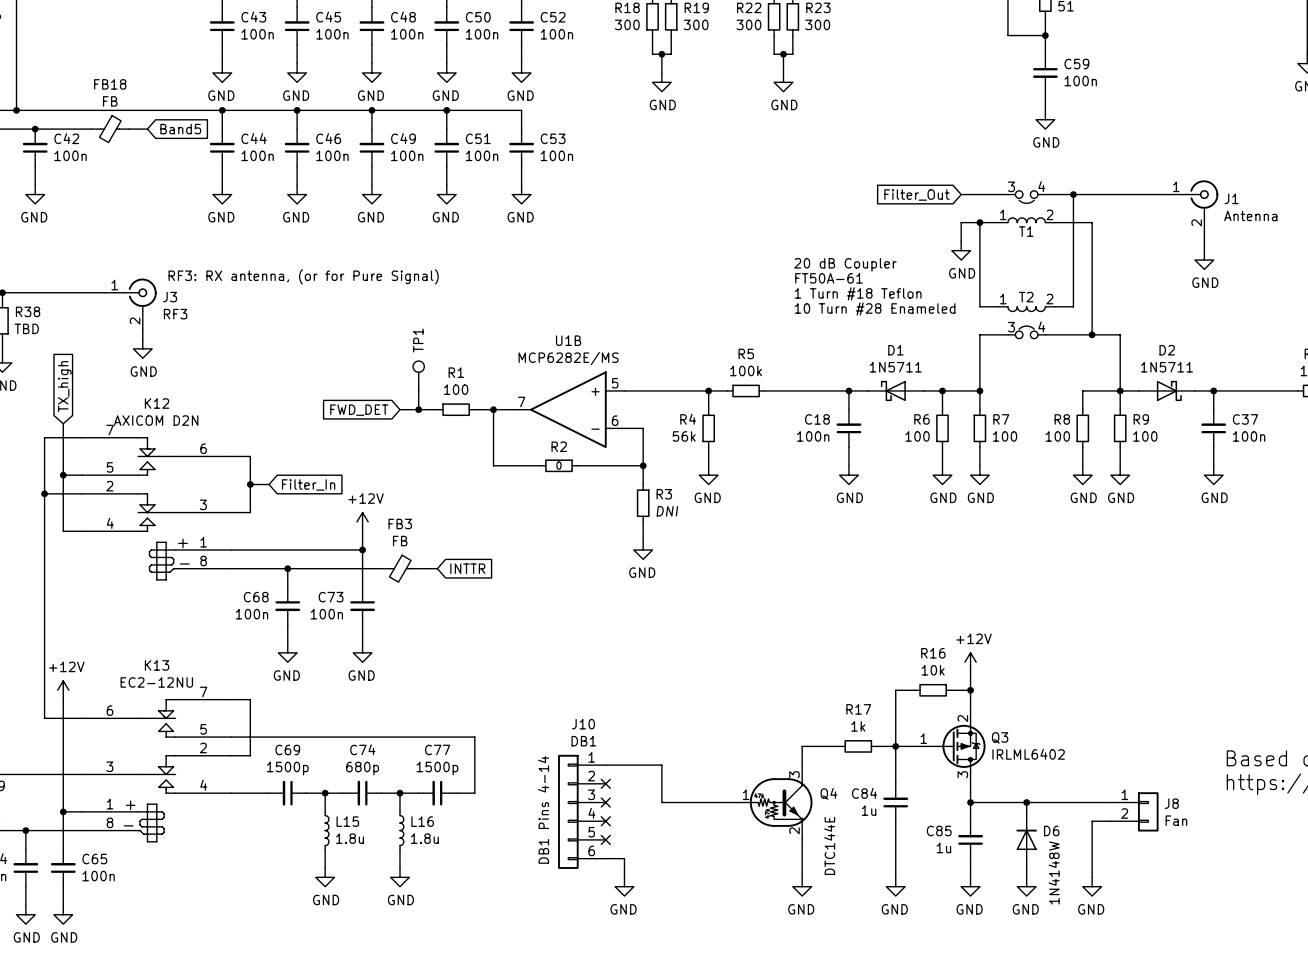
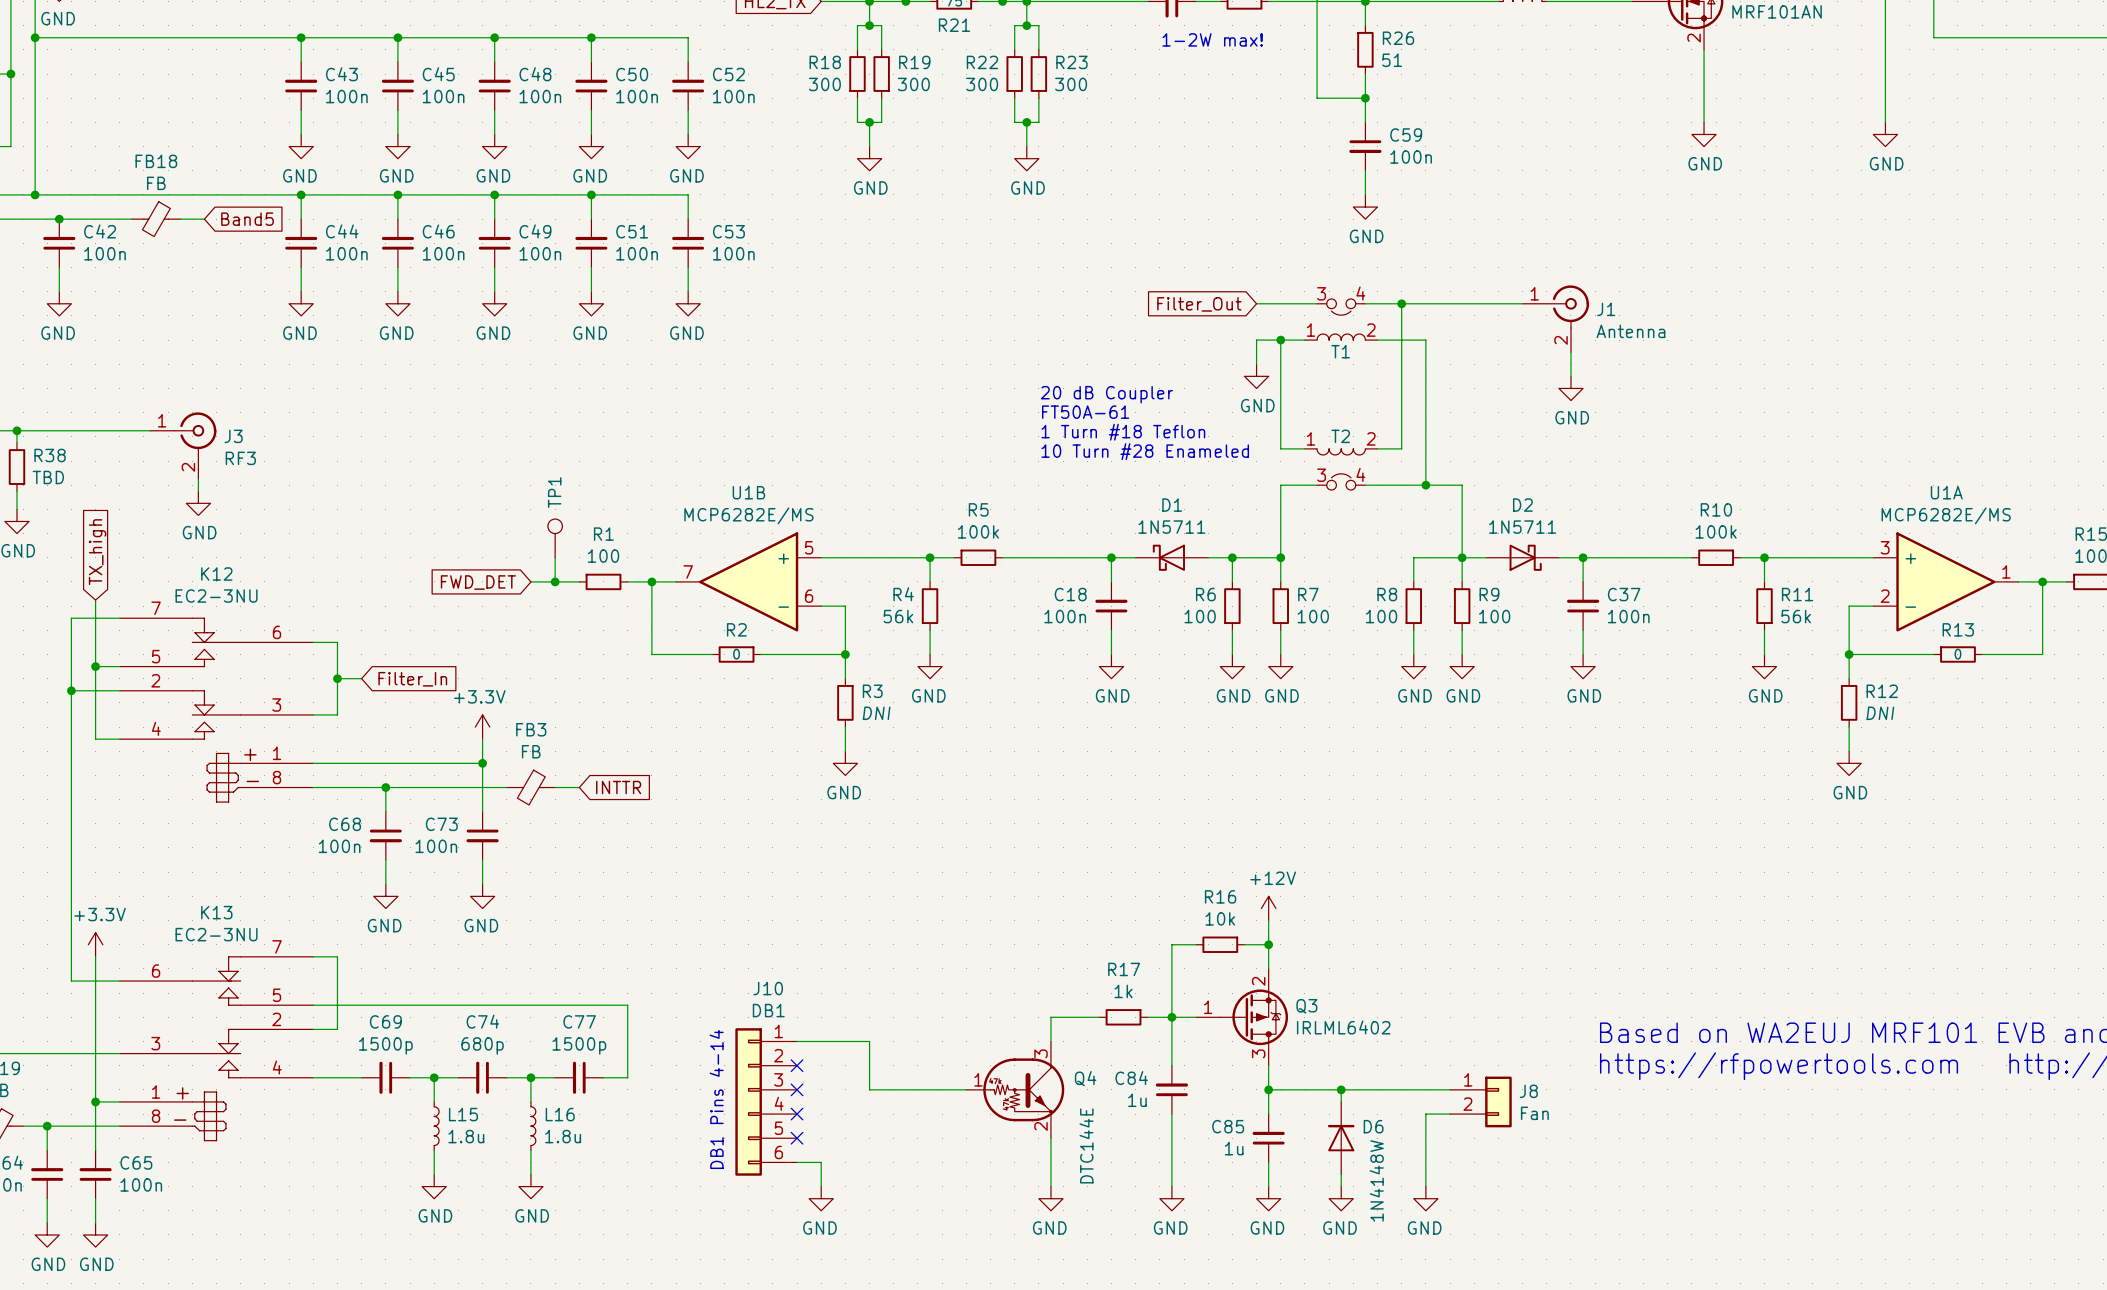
text: RF3: RX antenna, (or for Pure Signal) (303, 276) -> none
K12 value: AXICOM D2N (156, 420) -> EC2-3NU (216, 596)
power symbol: +12V (362, 521) -> +3.3V (482, 727)
K13 value: EC2-12NU (156, 682) -> EC2-3NU (216, 934)
power symbol: +12V (63, 690) -> +3.3V (95, 944)

